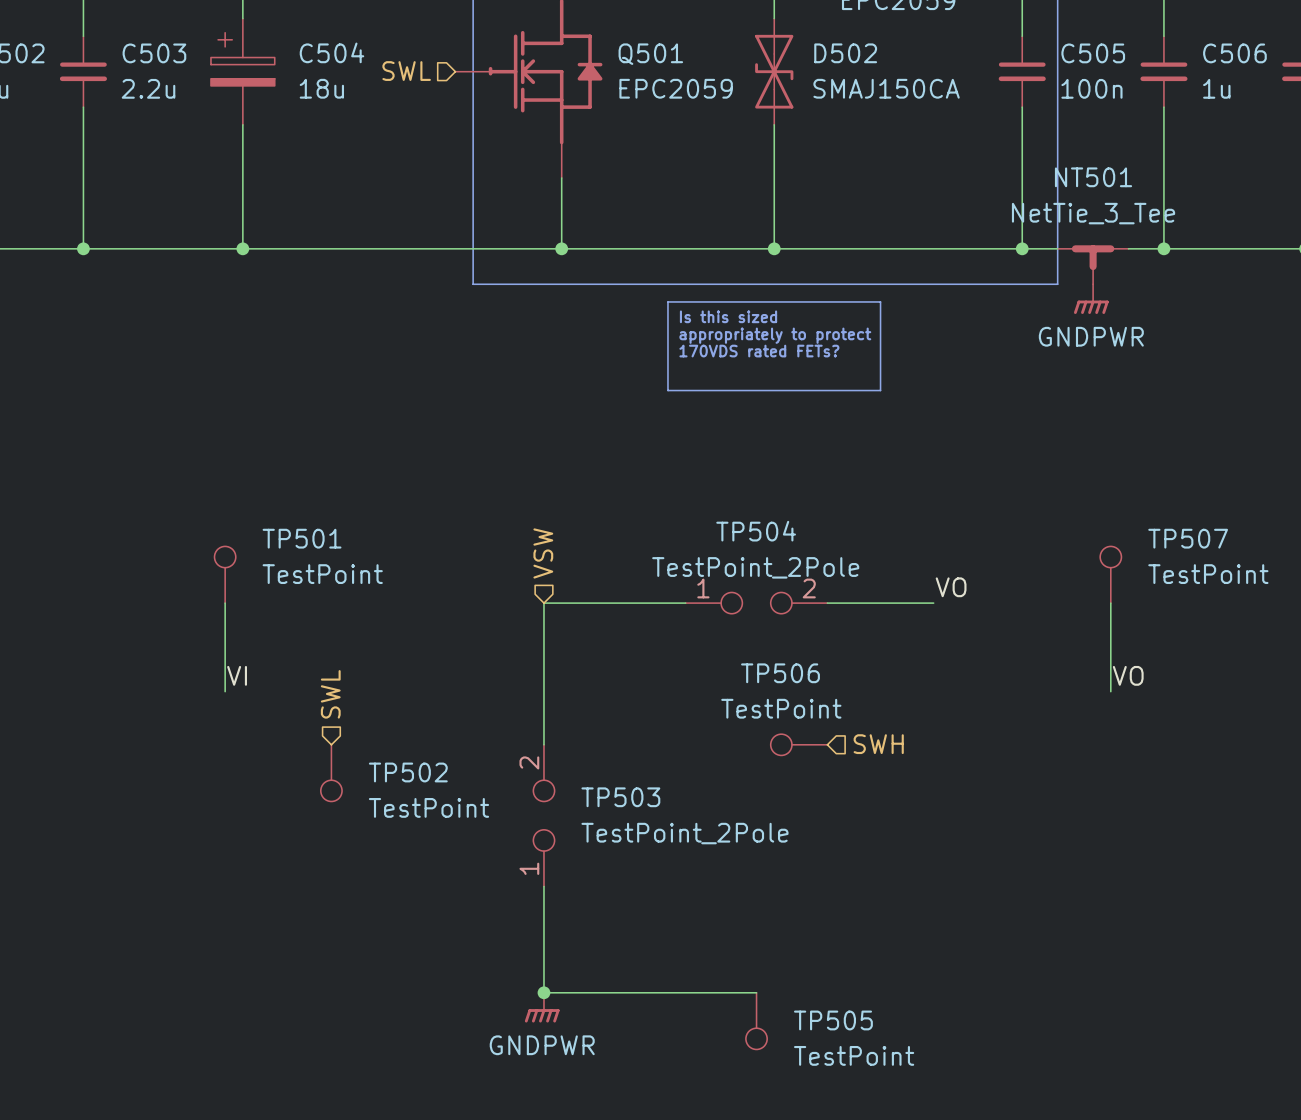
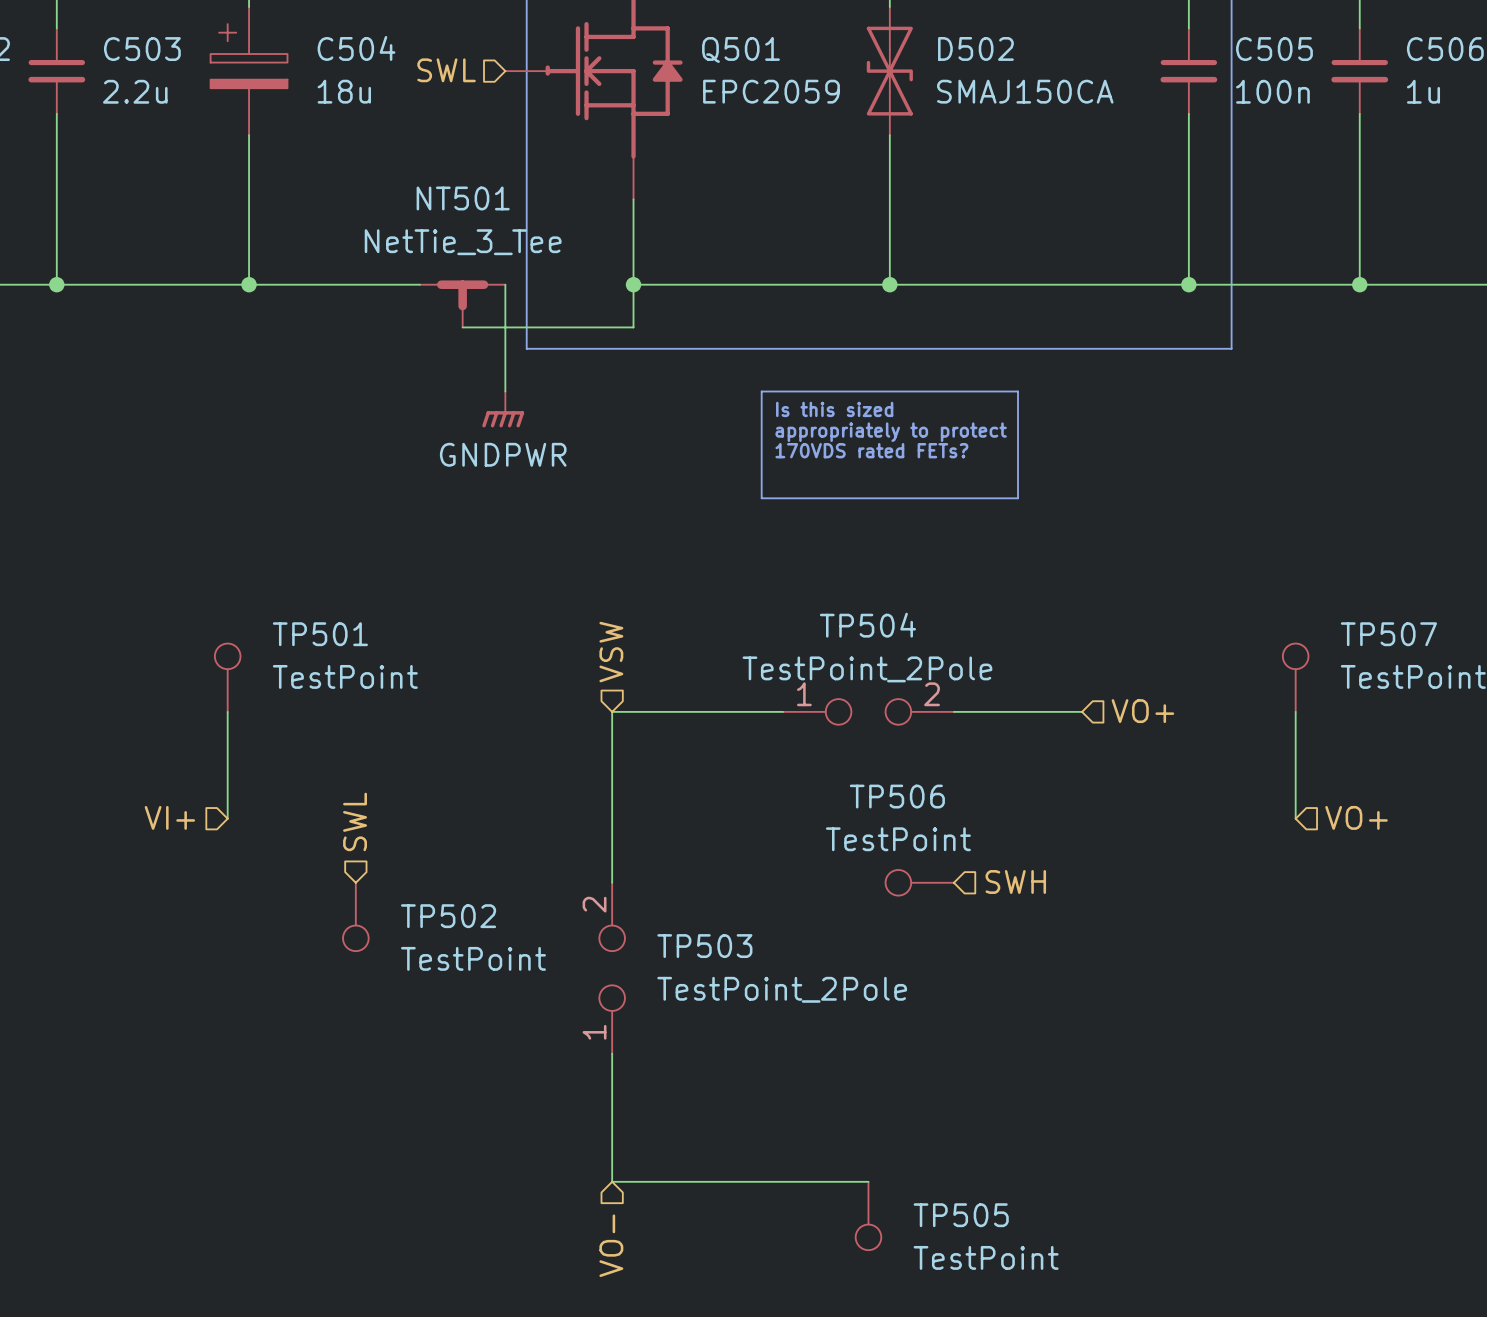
wire: (384, 248) (561, 248) -> (462, 327) (633, 327) (633, 284)
wire: none -> (505, 284) (505, 391)
NT501 position: (1093, 265) -> (462, 305)
line: (473, 284) (1057, 284) -> none
power symbol: GNDPWR (1091, 299) -> none
line: (667, 301) (667, 337) -> (761, 348) (526, 348) (526, 327)
line: (880, 301) (880, 337) -> (1017, 348) (1231, 348) (1231, 327)
text: Is this sized (728, 316) -> none
text position: appropriately to protect (775, 335) -> appropriately to protect (891, 432)
line: none -> (761, 391) (1017, 391)
text: 170VDS rated FETs? (759, 351) -> Is this sized (834, 409)
power symbol: none -> GNDPWR (503, 409)
text: none -> 170VDS rated FETs? (871, 450)
line: (667, 390) (880, 390) -> (761, 455) (761, 498) (1017, 498) (1017, 455)
label: VO (951, 587) -> none
hierarchical label: none -> VO+ (1142, 711)
label: VI (237, 675) -> none
label: VO (1128, 675) -> none
hierarchical label: none -> VI+ (169, 817)
hierarchical label: none -> VO+ (1356, 817)
junction: (543, 992) -> none
power symbol: GNDPWR (542, 1007) -> none
hierarchical label: none -> VO- (611, 1245)

